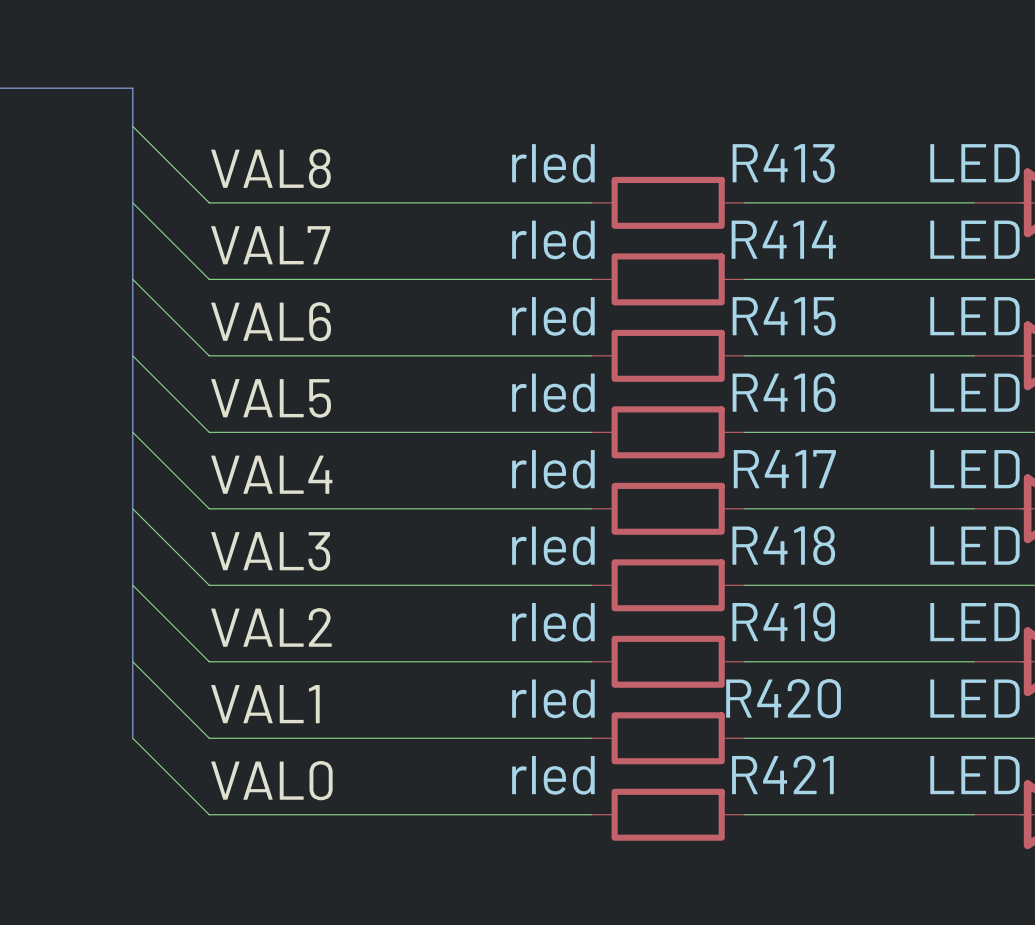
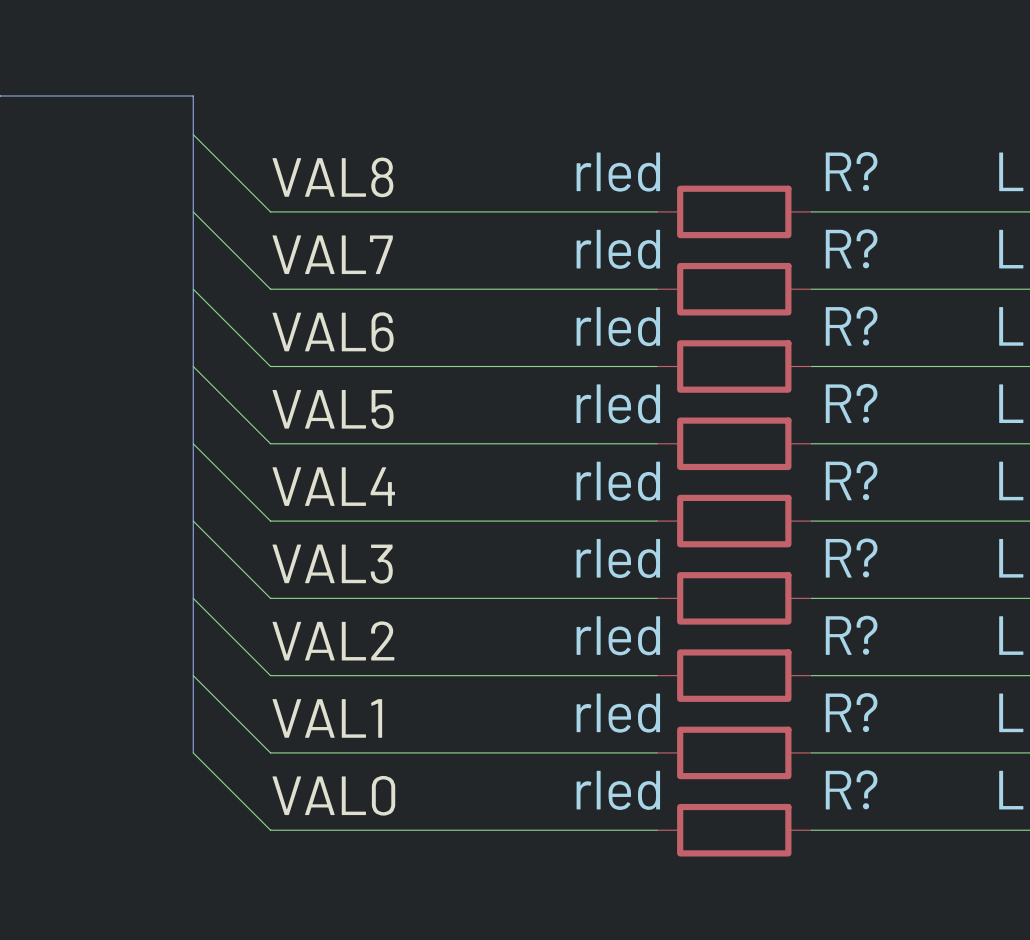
R413 name: R413 (783, 163) -> R? (851, 171)
R414 name: R414 (783, 239) -> R? (851, 248)
R415 name: R415 (784, 316) -> R? (851, 326)
R416 name: R416 (784, 392) -> R? (851, 403)
R417 name: R417 (784, 469) -> R? (851, 480)
R418 name: R418 (783, 545) -> R? (851, 558)
R419 name: R419 (783, 622) -> R? (851, 635)
R420 name: R420 (783, 698) -> R? (851, 712)
R421 name: R421 (782, 774) -> R? (851, 789)

